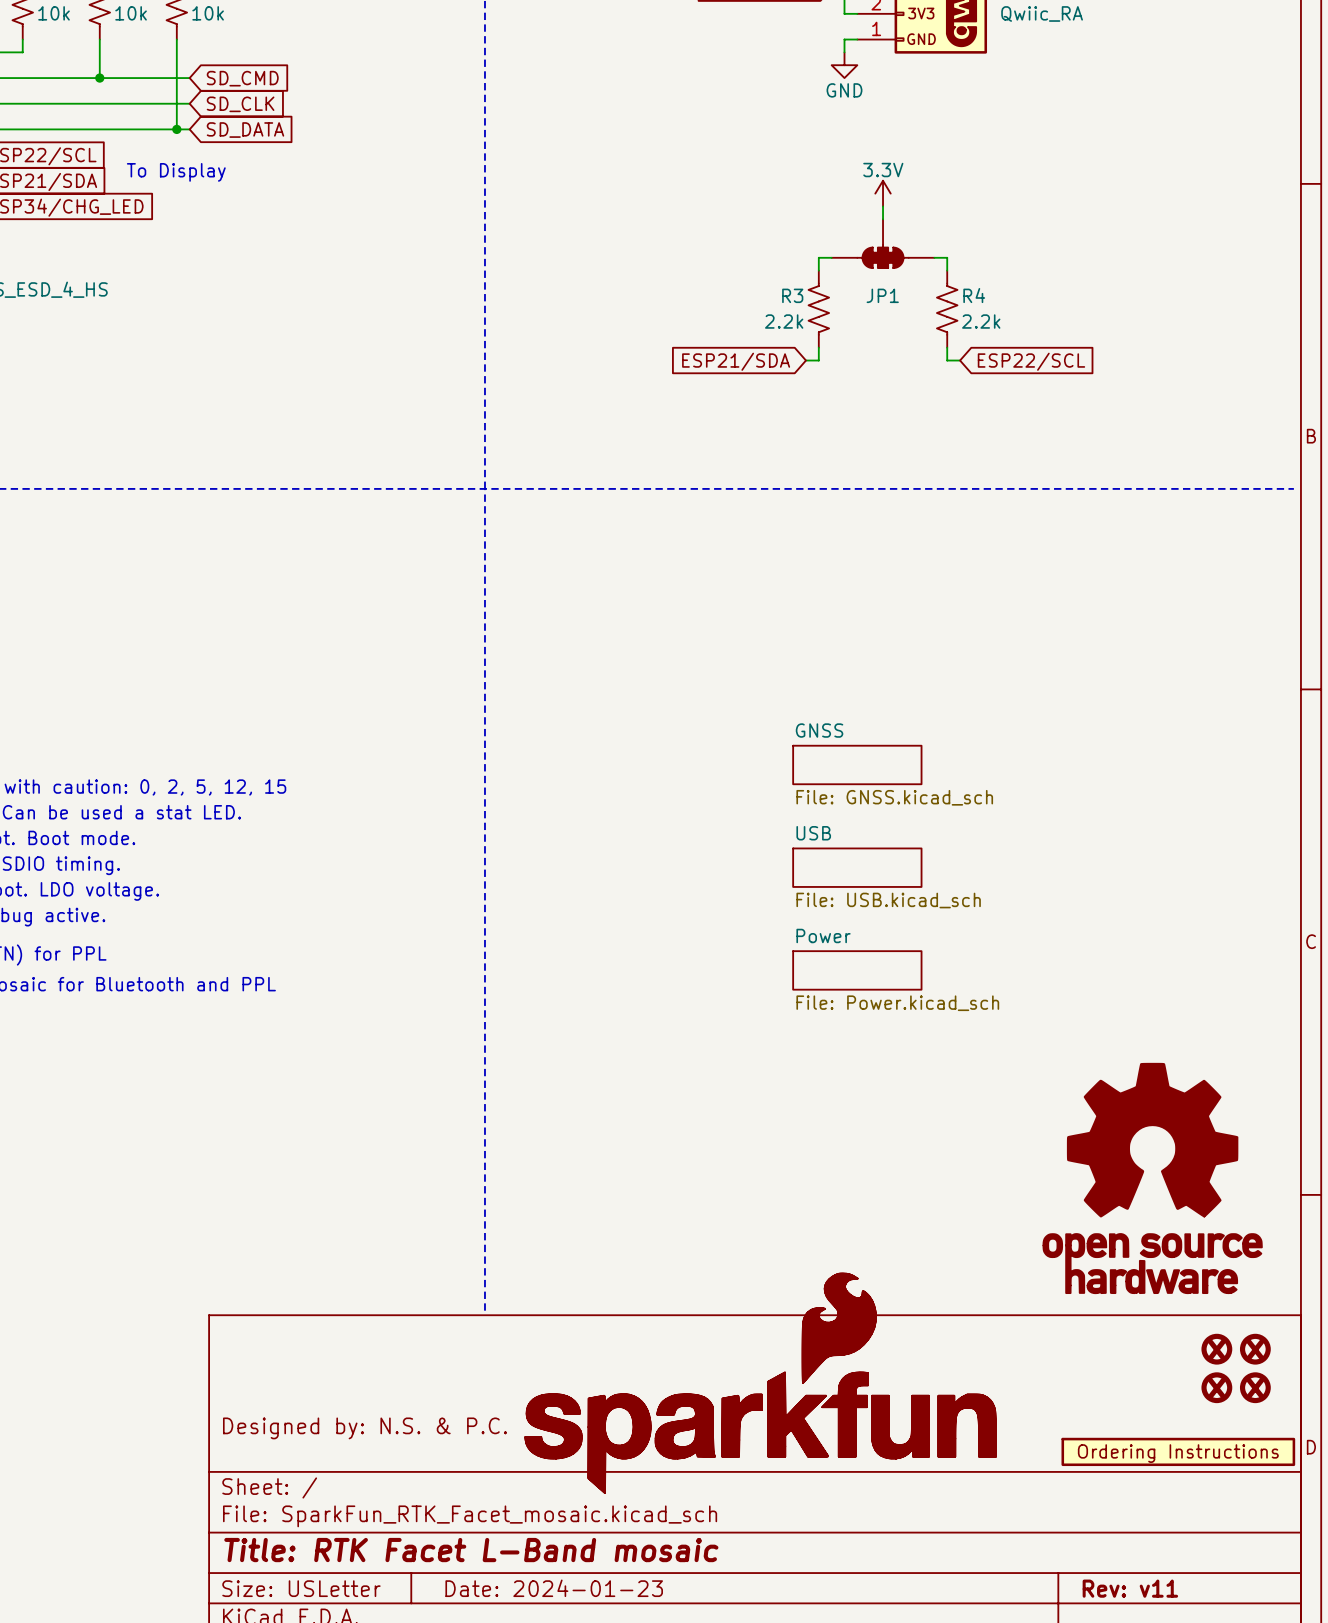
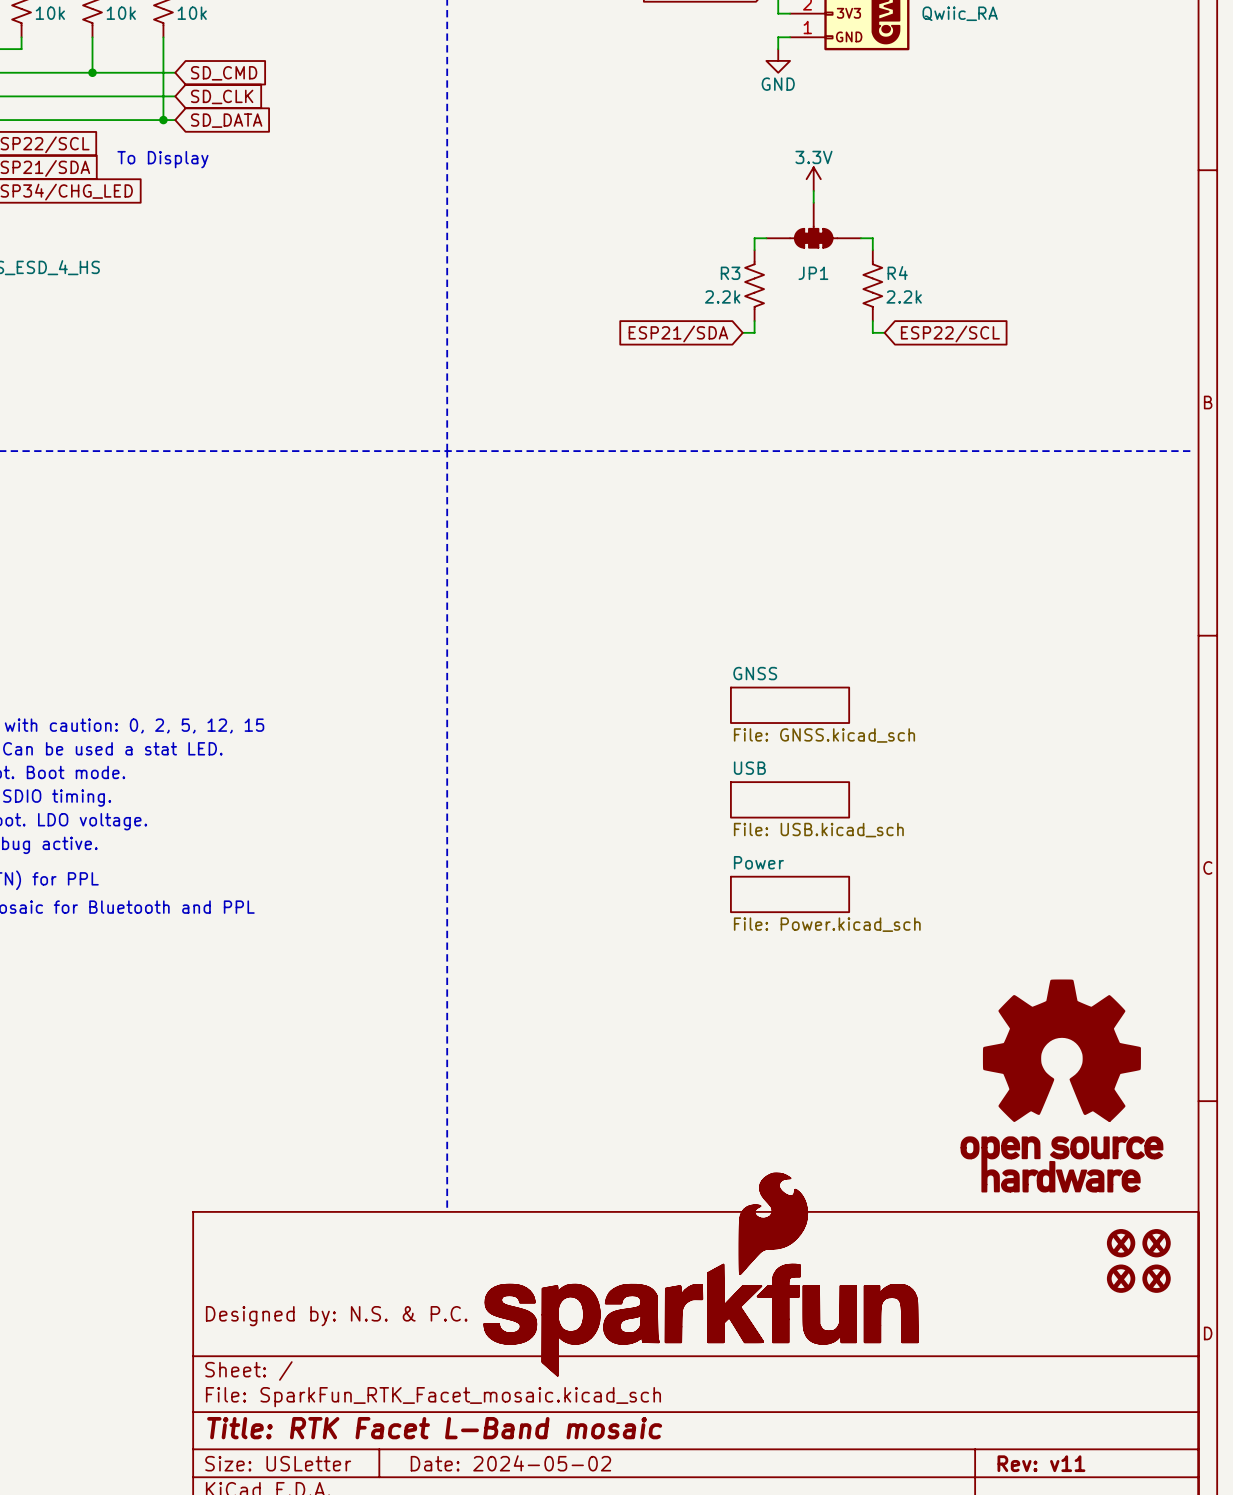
part: (1178, 1451) -> none
title block: Date: 2024-01-23 (554, 1588) -> Date: 2024-05-02 (510, 1463)

